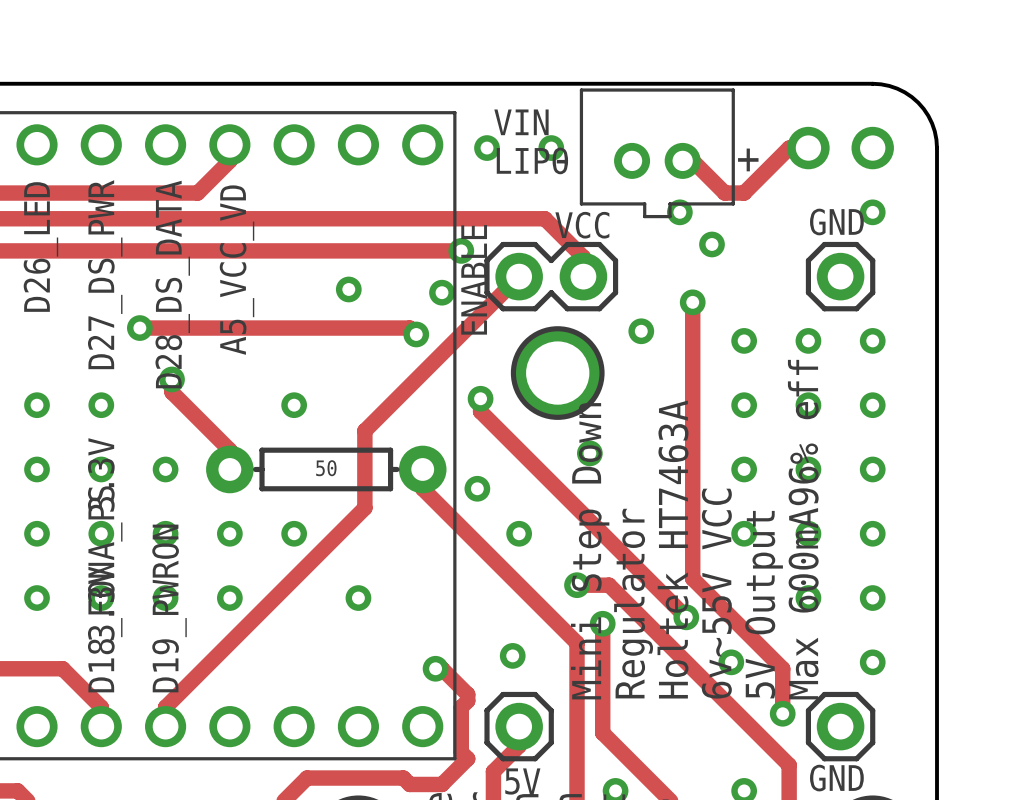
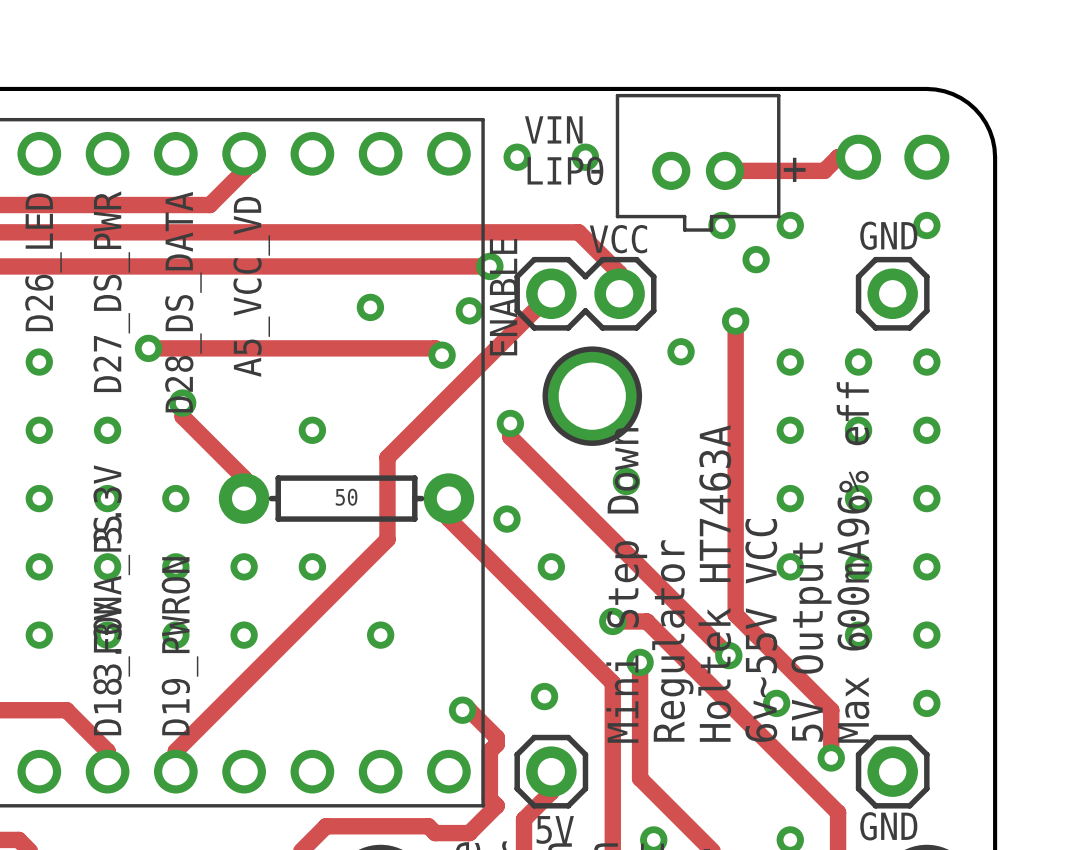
track: (692, 160) (724, 193) (744, 193) (776, 160) -> (735, 170) (824, 170)
via: none -> (790, 225)
via: none -> (39, 362)

